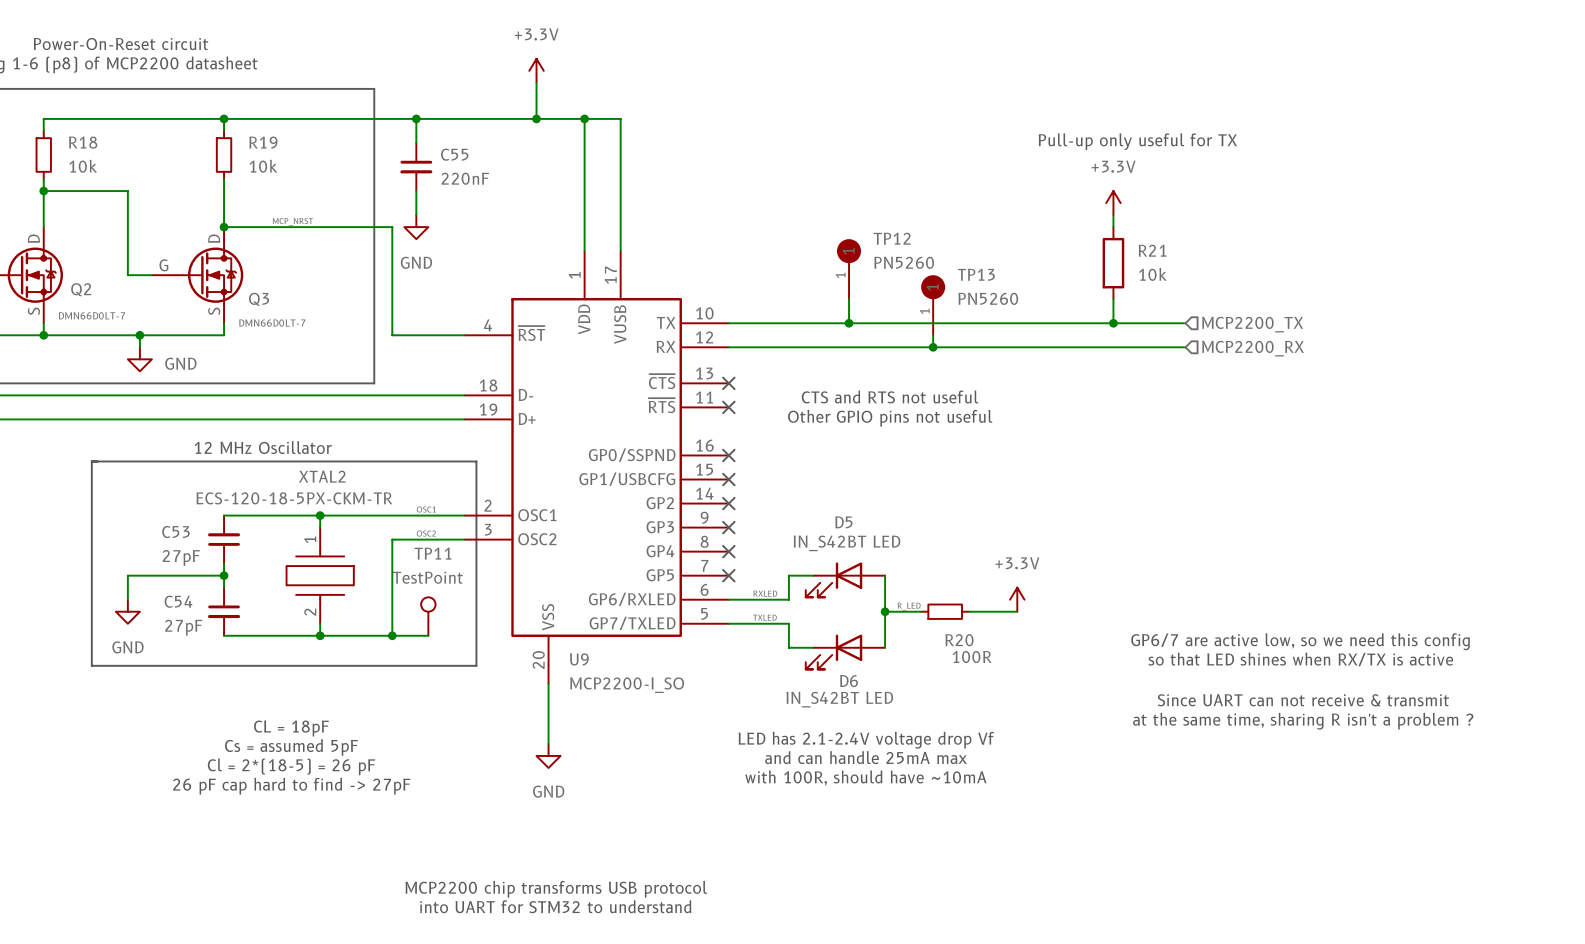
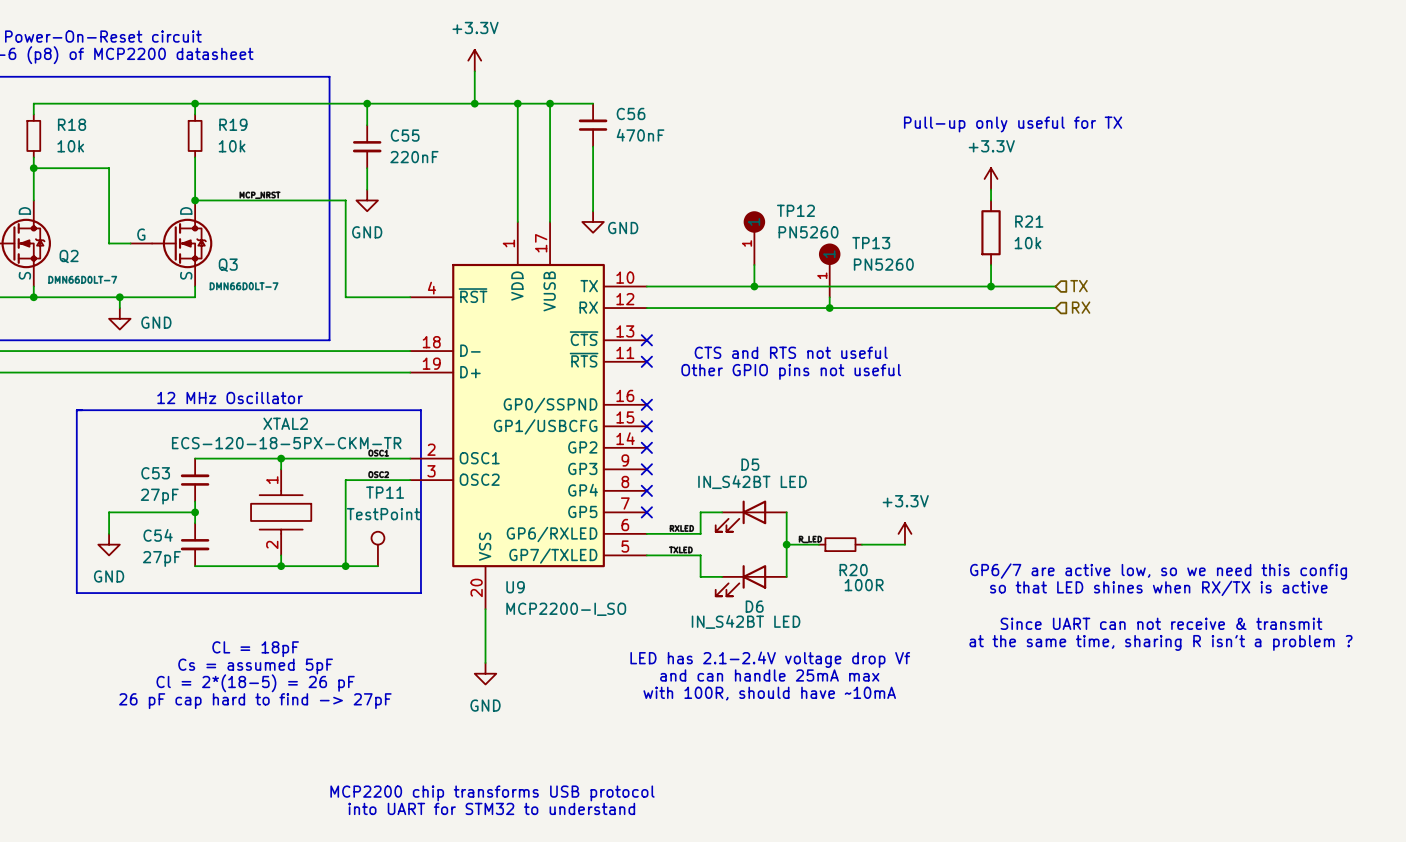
wire: none -> (550, 103) (593, 103)
junction: none -> (550, 103)
C56: none -> 470nF (593, 125)
wire: none -> (593, 146) (593, 211)
power symbol: none -> GND (593, 221)
hierarchical label: MCP2200_TX (1252, 324) -> TX (1079, 286)
hierarchical label: MCP2200_RX (1253, 348) -> RX (1081, 307)

